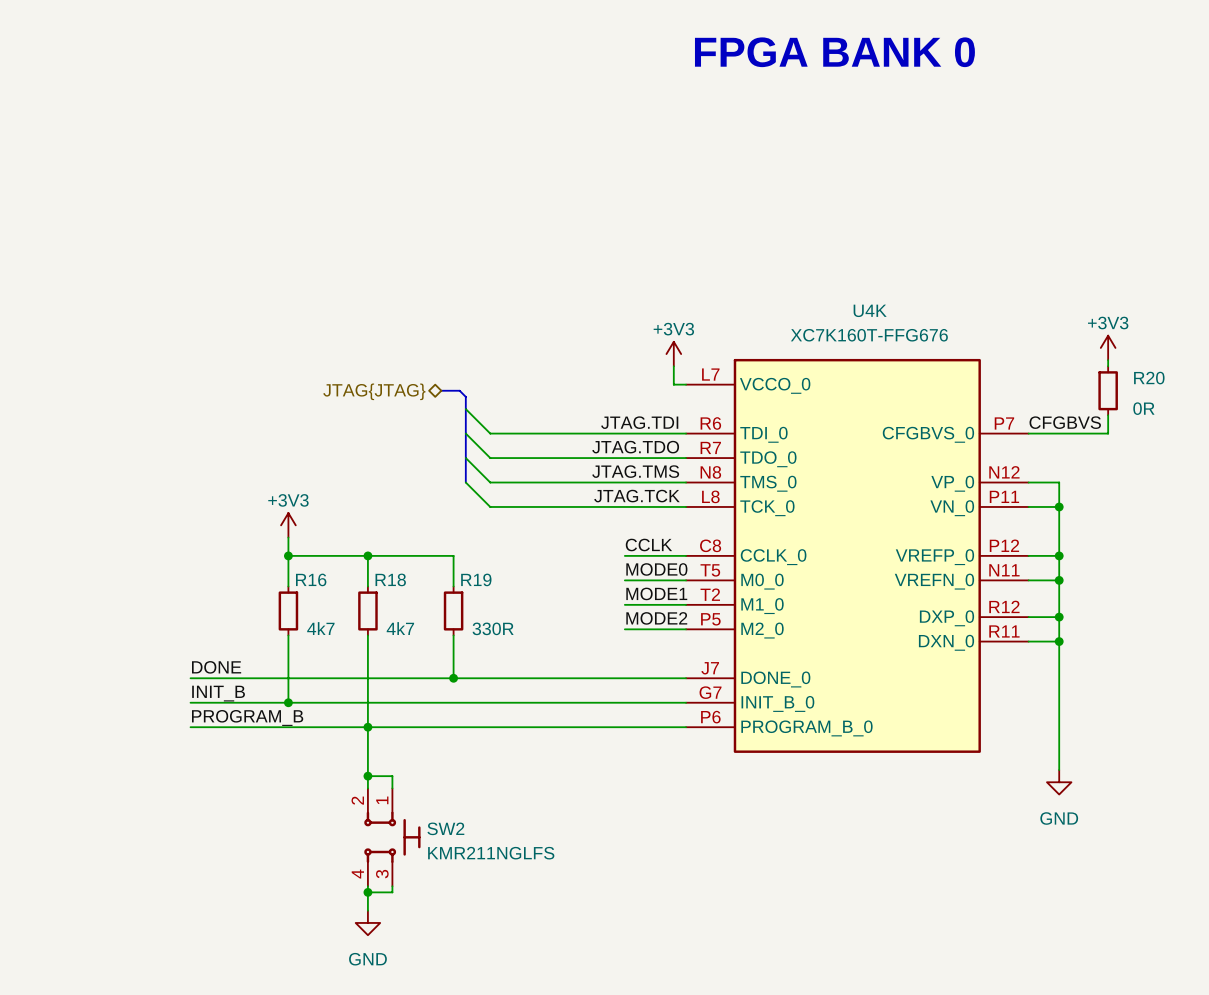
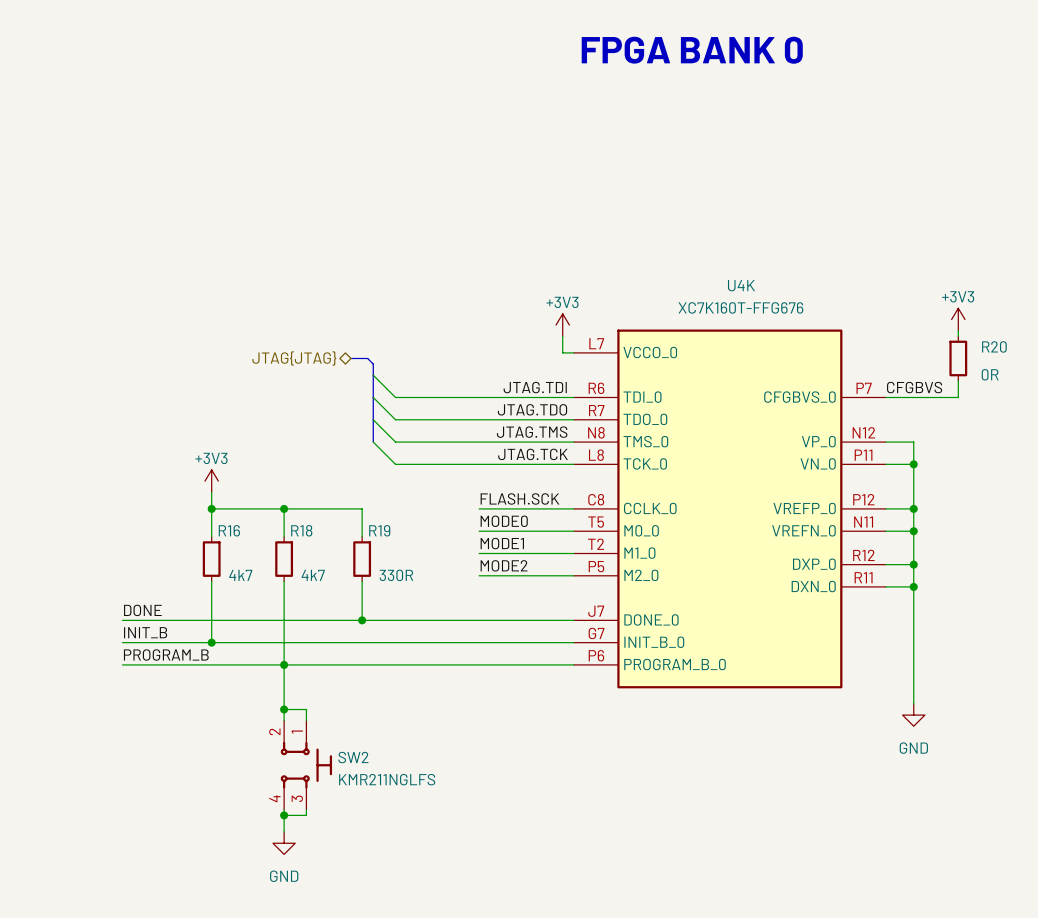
label: none -> FLASH.SCK (519, 498)
label: CCLK (648, 545) -> none
wire: none -> (479, 508) (518, 508)
label position: MODE0 (656, 569) -> MODE0 (504, 521)
wire: none -> (479, 531) (518, 531)
label position: MODE1 (656, 593) -> MODE1 (502, 543)
wire: none -> (479, 553) (518, 553)
label position: MODE2 (656, 618) -> MODE2 (504, 565)
wire: none -> (479, 575) (518, 575)

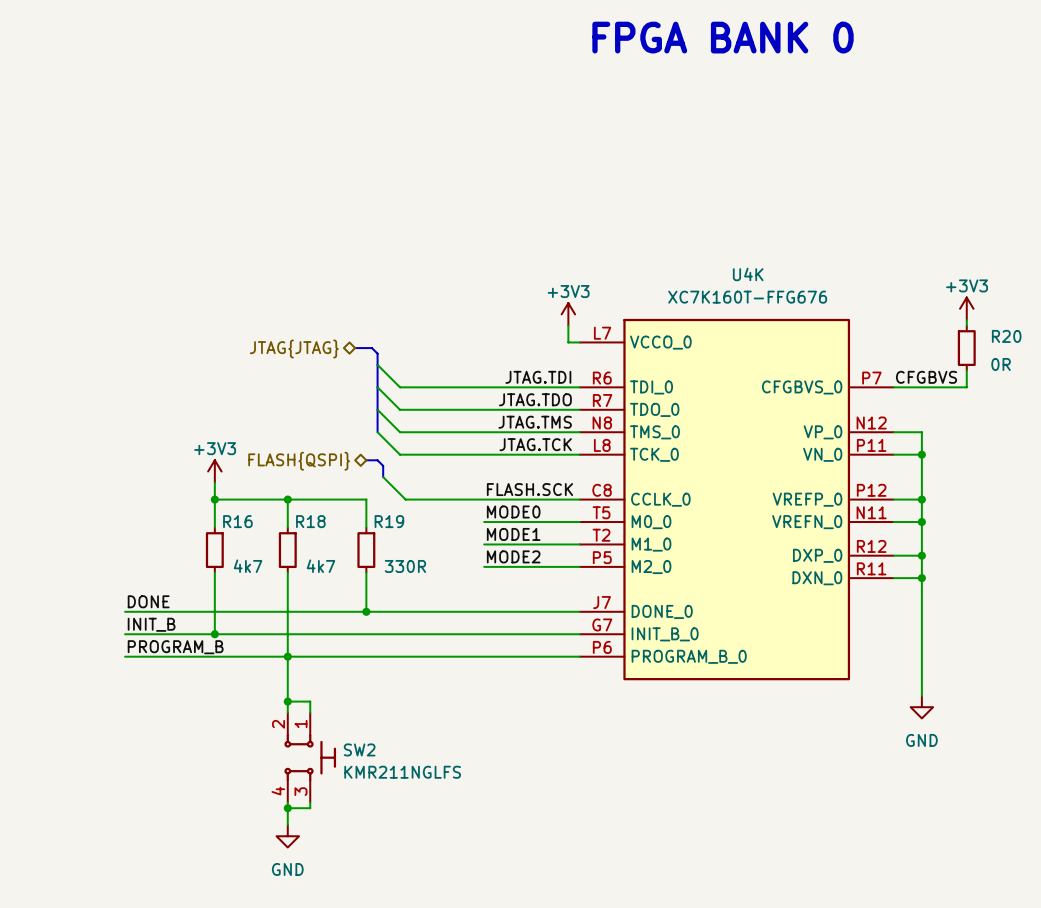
hierarchical label: none -> FLASH{QSPI} (299, 461)
bus: none -> (366, 460) (377, 460) (383, 465) (383, 477)
wire: none -> (383, 477) (405, 499) (484, 499)

